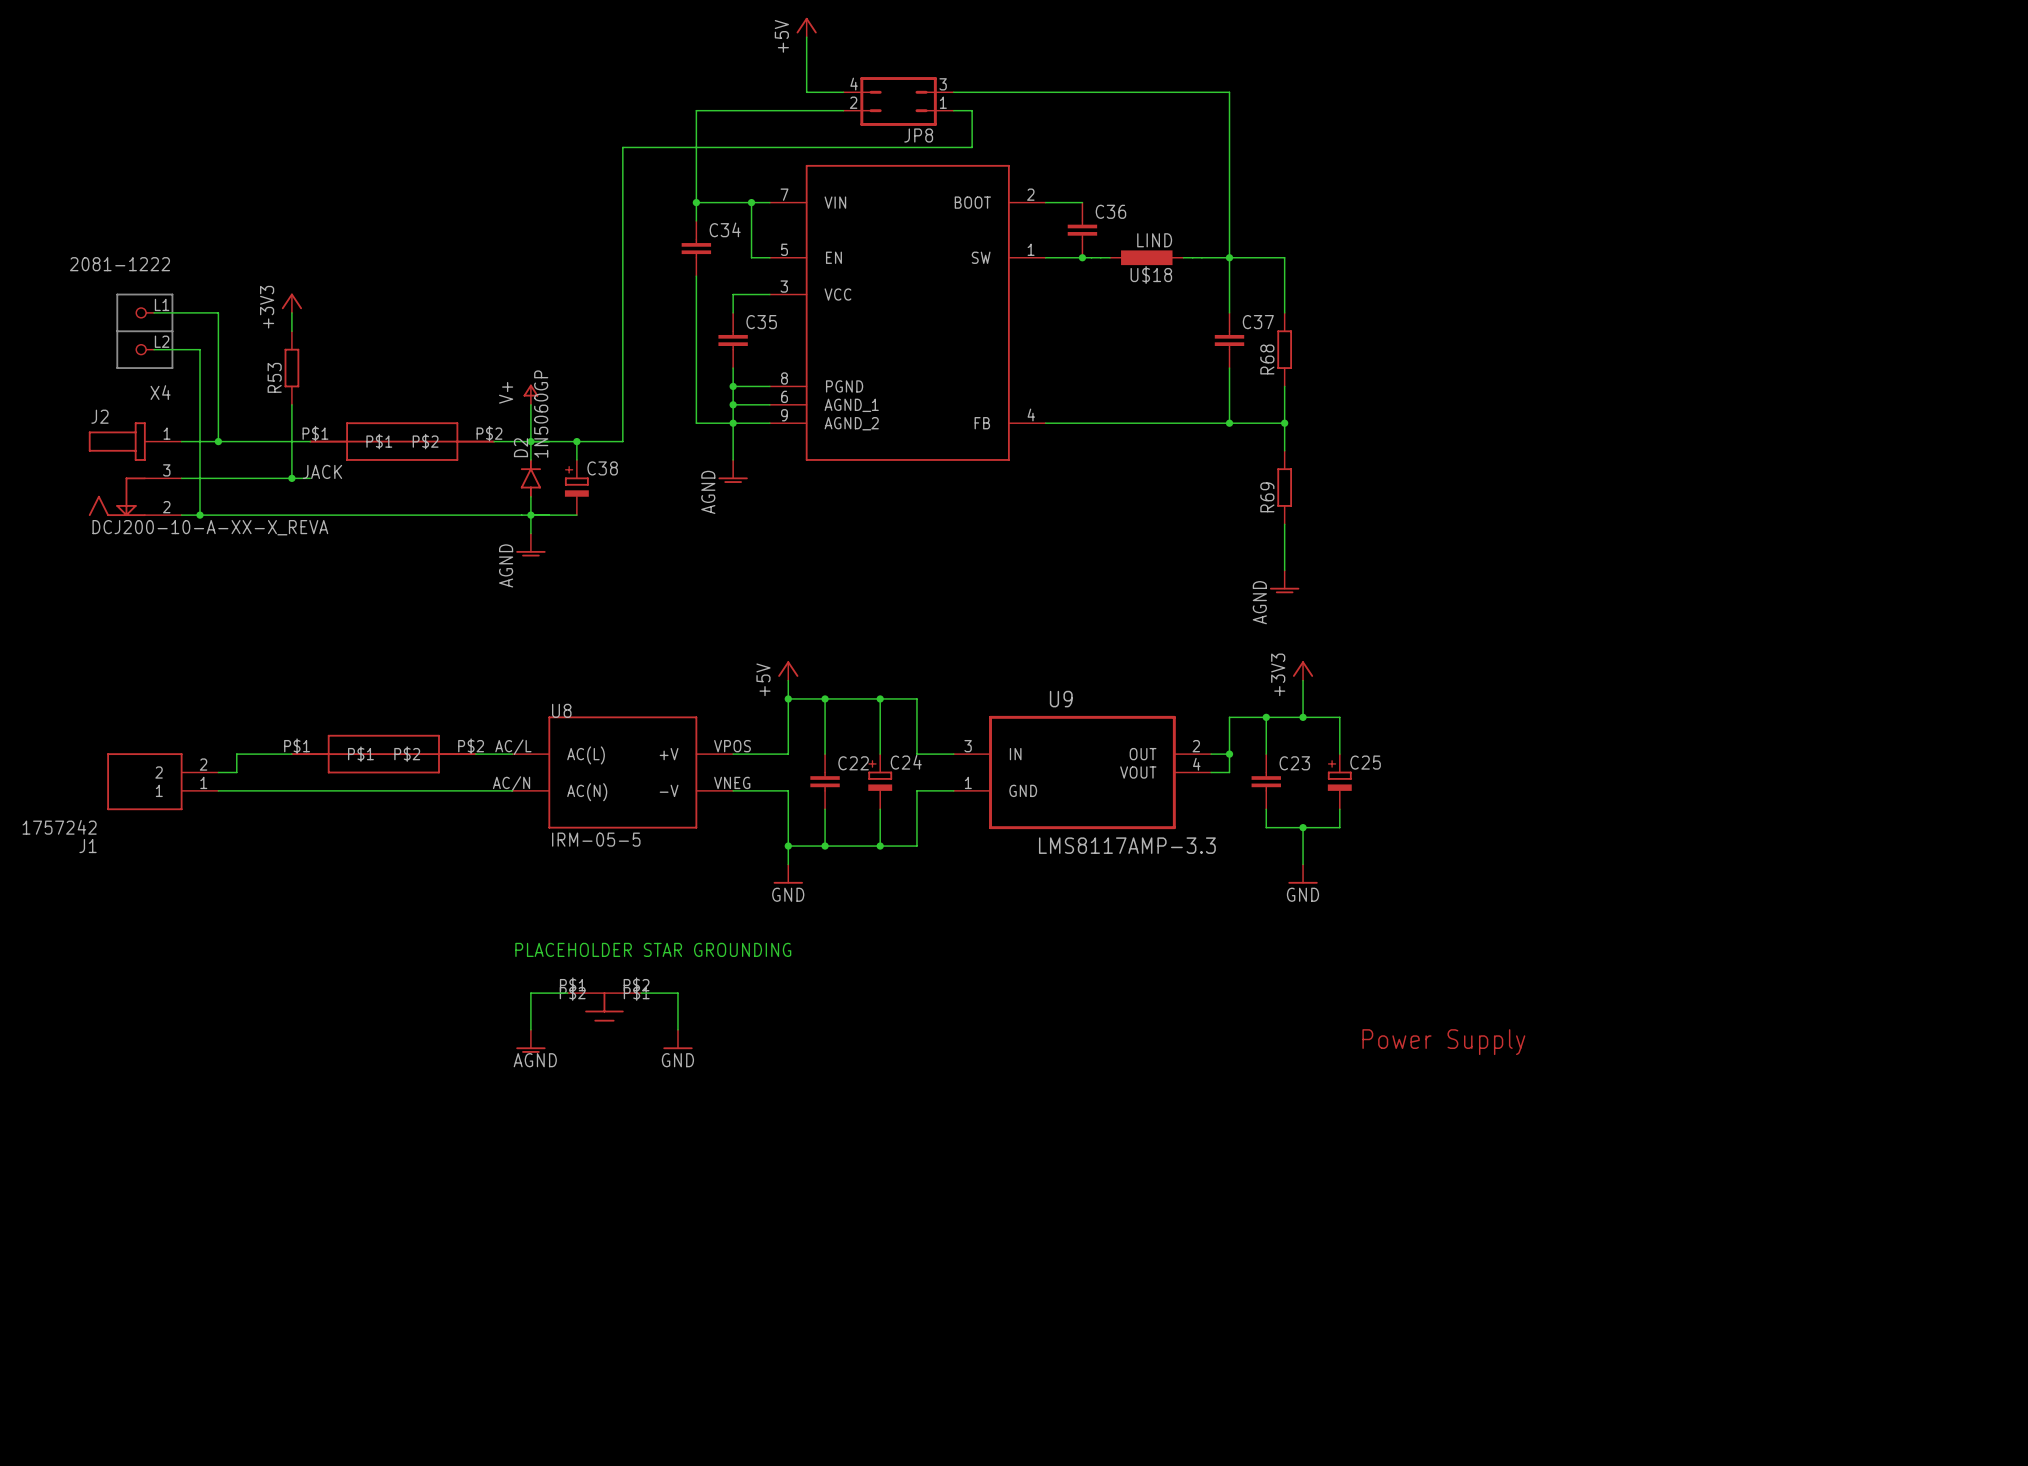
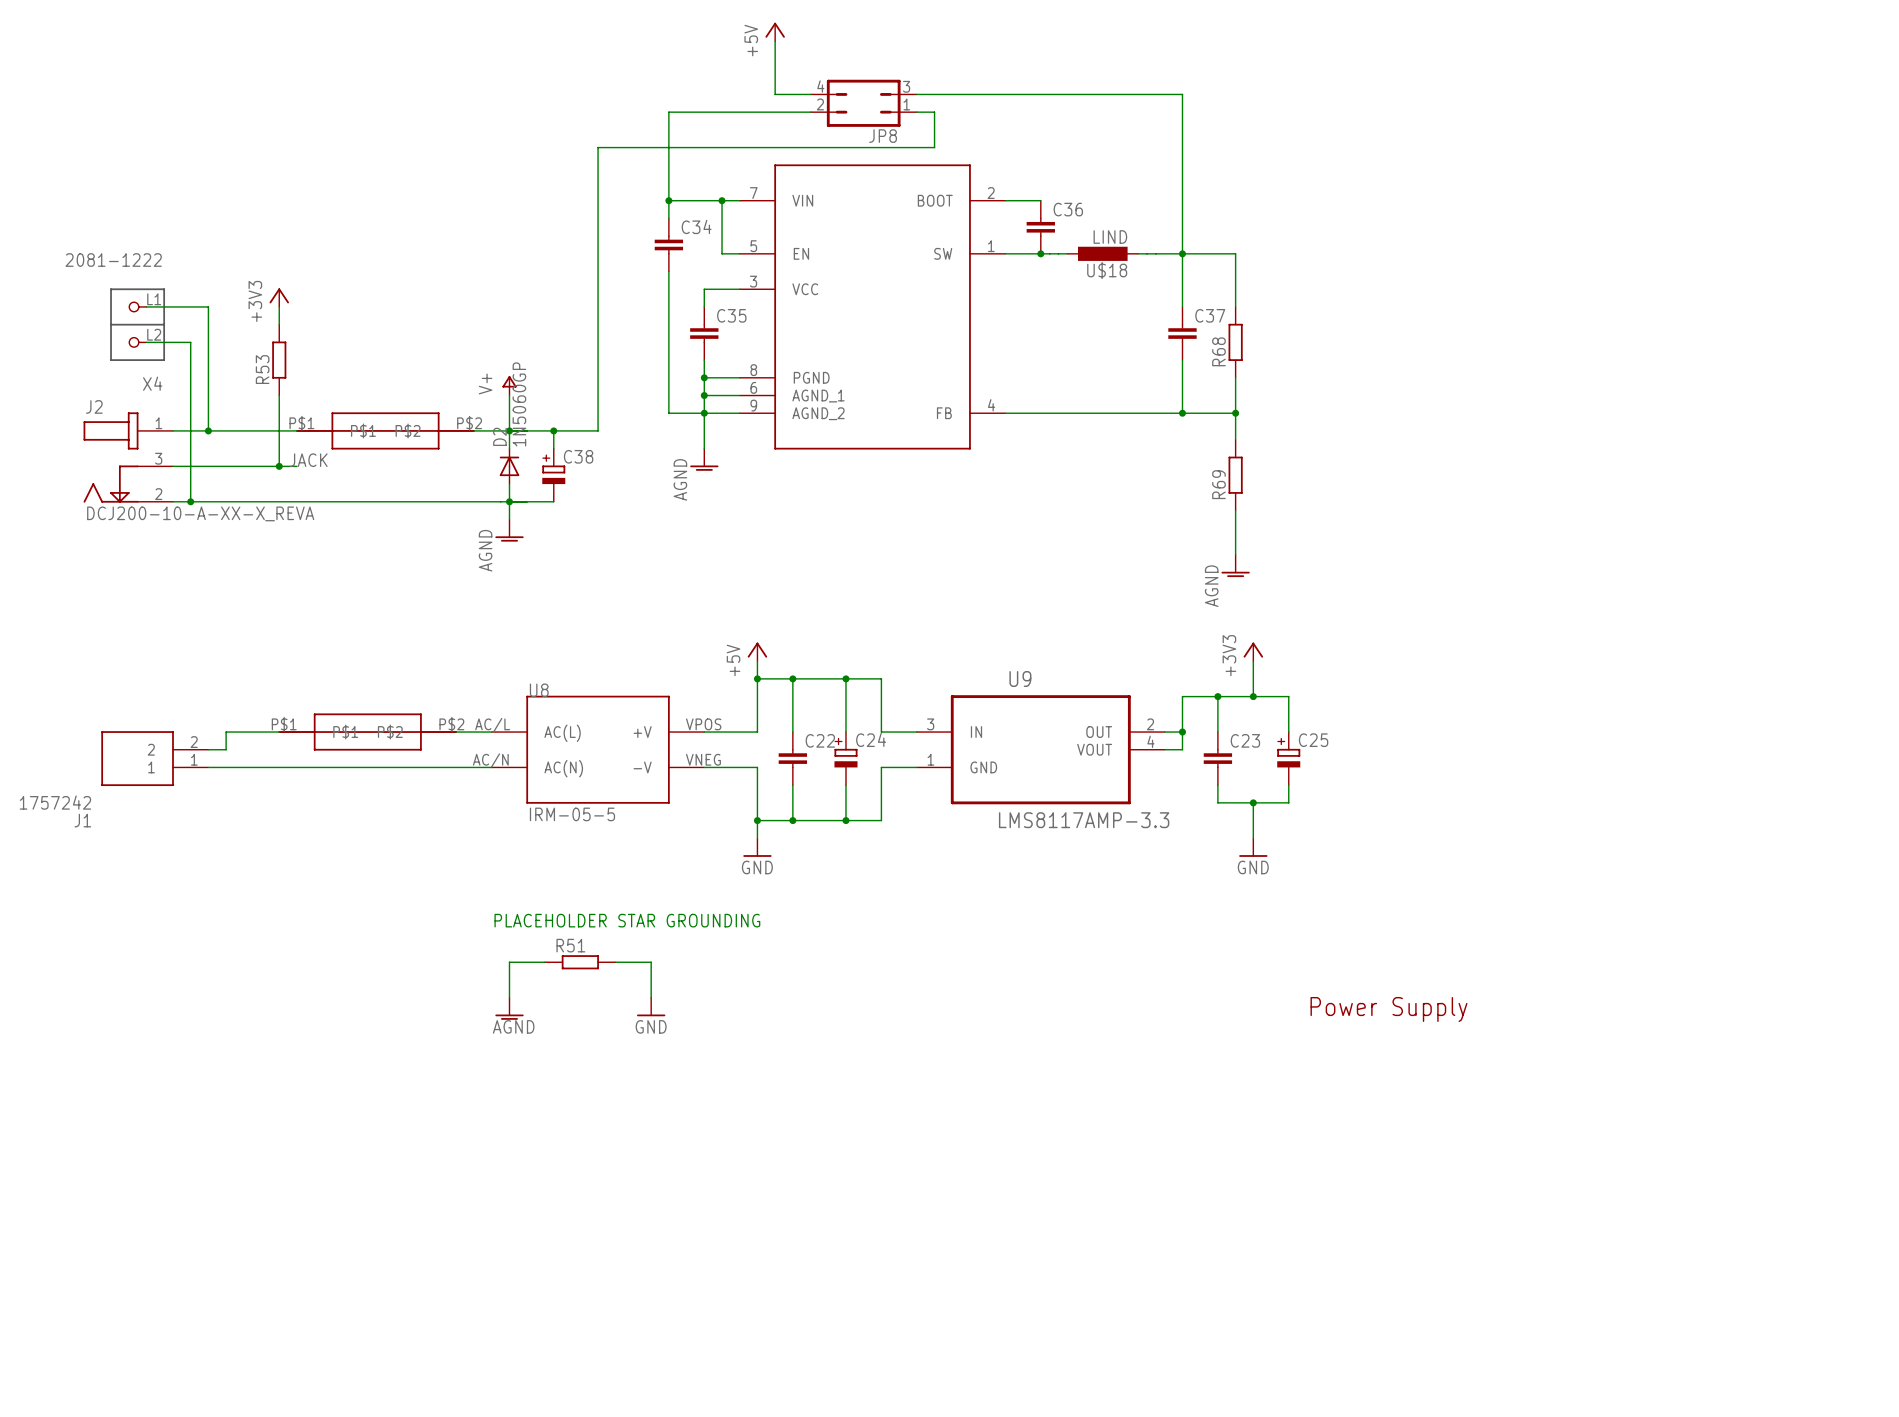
D2 symbol: [520, 459, 542, 498] -> [499, 448, 520, 485]
R51: none -> (580, 962)
part: (604, 1006) -> none

